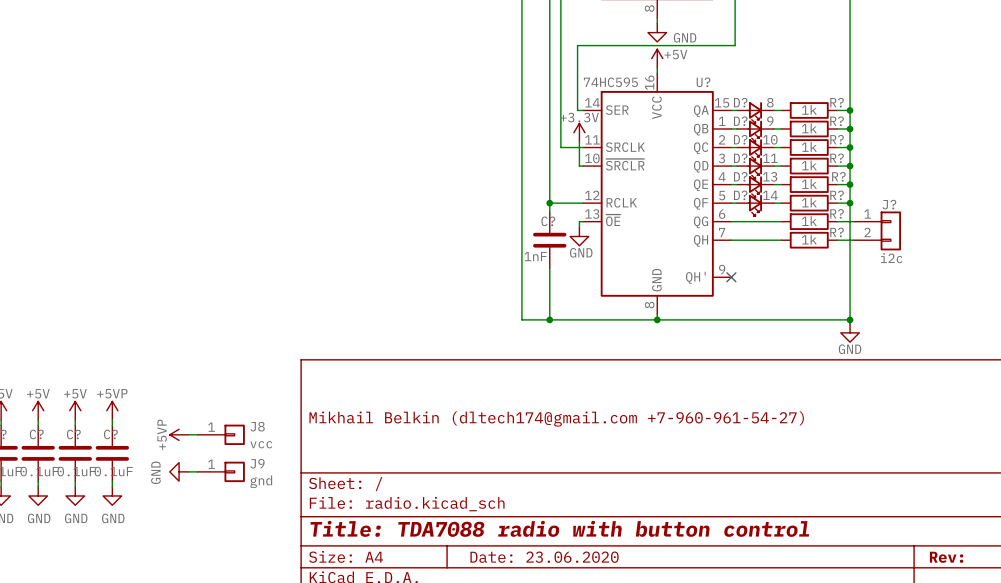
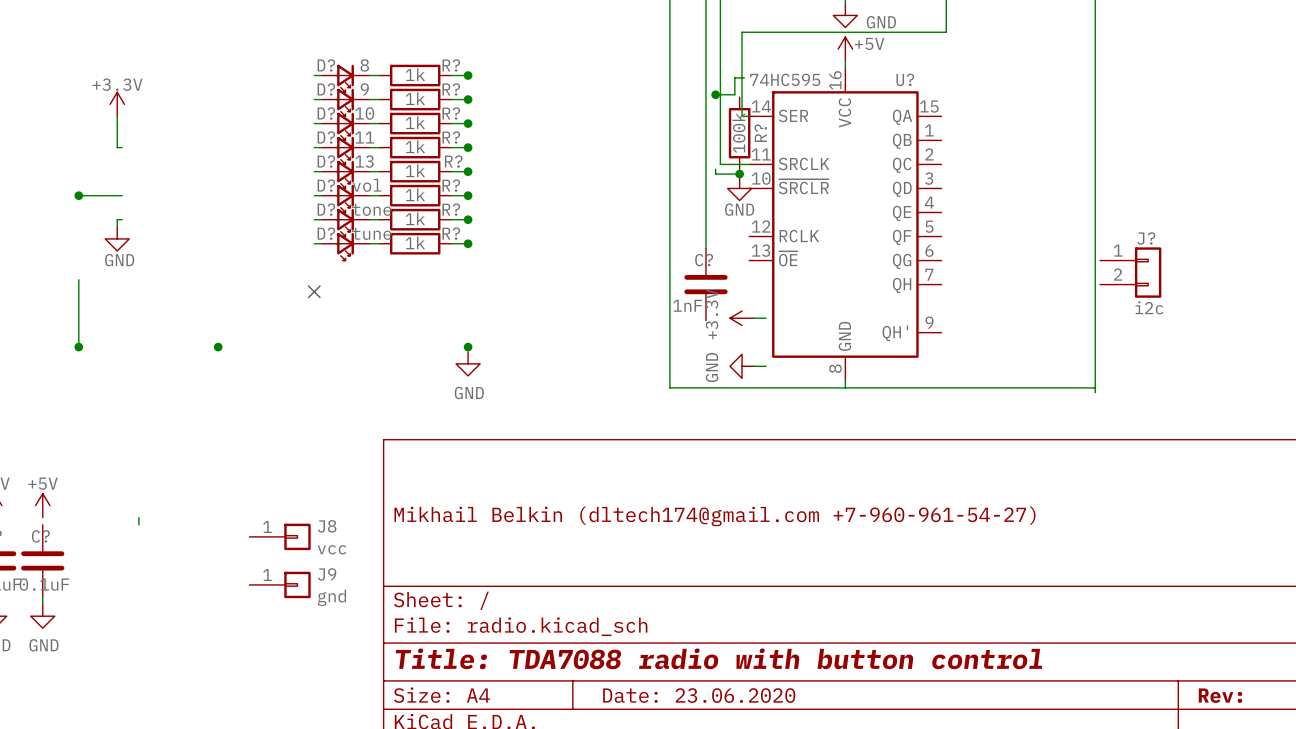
wire: none -> (314, 75) (321, 75)
wire: none -> (369, 75) (379, 75)
R?: none -> 1k (415, 75)
wire: none -> (451, 75) (468, 75)
junction: none -> (468, 75)
wire: none -> (744, 77) (734, 77) (734, 94) (715, 94)
D?: none -> 8 (345, 78)
junction: none -> (715, 94)
wire: none -> (314, 99) (321, 99)
wire: none -> (369, 99) (379, 99)
R?: none -> 1k (415, 99)
wire: none -> (451, 99) (468, 99)
junction: none -> (468, 99)
D?: none -> 9 (345, 102)
power symbol: none -> +3.3V (117, 104)
wire: none -> (117, 116) (117, 147) (122, 147)
wire: (731, 110) (736, 110) -> none
wire: (774, 110) (781, 110) -> none
R?: 1k (809, 110) -> none
wire: (837, 110) (850, 110) -> none
junction: (850, 110) -> none
D?: 8 (755, 112) -> none
wire: none -> (314, 123) (321, 123)
wire: none -> (369, 123) (379, 123)
R?: none -> 1k (415, 123)
wire: none -> (451, 123) (468, 123)
junction: none -> (468, 123)
D?: none -> 10 (345, 126)
R?: none -> 100k (739, 133)
wire: (731, 128) (736, 128) -> none
wire: (774, 128) (781, 128) -> none
R?: 1k (809, 128) -> none
wire: (837, 128) (850, 128) -> none
junction: (850, 128) -> none
D?: 9 (755, 131) -> none
power symbol: +3.3V (579, 132) -> none
wire: none -> (314, 147) (321, 147)
wire: none -> (369, 147) (379, 147)
R?: none -> 1k (415, 147)
wire: none -> (451, 147) (468, 147)
junction: none -> (468, 147)
D?: none -> 11 (345, 150)
wire: (579, 141) (579, 166) (583, 166) -> none
wire: (731, 147) (736, 147) -> none
wire: (774, 147) (781, 147) -> none
R?: 1k (809, 147) -> none
wire: (837, 147) (850, 147) -> none
junction: (850, 147) -> none
D?: 10 (755, 149) -> none
wire: none -> (715, 169) (715, 174) (739, 174)
wire: none -> (314, 171) (321, 171)
wire: none -> (369, 171) (379, 171)
R?: none -> 1k (415, 171)
wire: none -> (451, 171) (468, 171)
junction: none -> (468, 171)
junction: none -> (739, 174)
D?: none -> 13 (345, 174)
power symbol: none -> GND (739, 188)
wire: (731, 166) (736, 166) -> none
wire: (774, 166) (781, 166) -> none
R?: 1k (809, 166) -> none
wire: (837, 166) (850, 166) -> none
junction: (850, 166) -> none
D?: 11 (755, 168) -> none
wire: none -> (78, 195) (122, 195)
junction: none -> (78, 195)
wire: none -> (314, 195) (321, 195)
wire: none -> (369, 195) (379, 195)
R?: none -> 1k (415, 195)
wire: none -> (451, 195) (468, 195)
junction: none -> (468, 195)
D?: none -> vol (345, 198)
wire: (731, 184) (736, 184) -> none
wire: (774, 184) (781, 184) -> none
R?: 1k (809, 184) -> none
wire: (837, 184) (850, 184) -> none
junction: (850, 184) -> none
D?: 13 (755, 186) -> none
wire: none -> (122, 219) (117, 219) (117, 226)
wire: none -> (314, 219) (321, 219)
wire: none -> (369, 219) (379, 219)
R?: none -> 1k (415, 219)
wire: none -> (451, 219) (468, 219)
junction: none -> (468, 219)
D?: none -> tone (345, 222)
wire: (549, 203) (583, 203) -> none
junction: (549, 203) -> none
wire: (731, 203) (736, 203) -> none
wire: (774, 203) (781, 203) -> none
R?: 1k (809, 203) -> none
wire: (837, 203) (850, 203) -> none
junction: (850, 203) -> none
power symbol: none -> GND (117, 238)
D?: 14 (755, 205) -> none
wire: none -> (314, 243) (321, 243)
wire: none -> (369, 243) (379, 243)
R?: none -> 1k (415, 243)
wire: none -> (451, 243) (468, 243)
junction: none -> (468, 243)
D?: none -> tune (345, 246)
wire: (583, 221) (579, 221) (579, 227) -> none
wire: (731, 221) (781, 221) -> none
R?: 1k (809, 221) -> none
wire: (837, 221) (853, 221) -> none
wire: none -> (78, 279) (78, 347)
power symbol: GND (579, 236) -> none
wire: (731, 240) (781, 240) -> none
R?: 1k (809, 240) -> none
wire: (837, 240) (853, 240) -> none
no-connect mark: none -> (314, 291)
power symbol: none -> +3.3V (742, 318)
wire: none -> (754, 318) (766, 318)
wire: (549, 268) (549, 319) -> none
no-connect mark: (731, 277) -> none
junction: none -> (78, 347)
junction: none -> (218, 347)
junction: none -> (468, 347)
power symbol: none -> GND (468, 363)
power symbol: none -> GND (742, 366)
wire: none -> (754, 366) (766, 366)
junction: (549, 319) -> none
junction: (657, 319) -> none
junction: (850, 319) -> none
power symbol: GND (850, 332) -> none
power symbol: +5V (75, 410) -> none
power symbol: +5VP (112, 410) -> none
wire: (38, 419) (38, 425) -> none
wire: (75, 419) (75, 425) -> none
power symbol: +5VP (179, 434) -> none
wire: (188, 434) (197, 434) -> none
C?: 0.1uF (75, 453) -> none
C?: 0.1uF (112, 453) -> none
power symbol: GND (179, 471) -> none
wire: (188, 471) (197, 471) -> none
wire: (75, 481) (75, 486) -> none
wire: (112, 481) (112, 486) -> none
power symbol: GND (75, 495) -> none
power symbol: GND (112, 495) -> none

